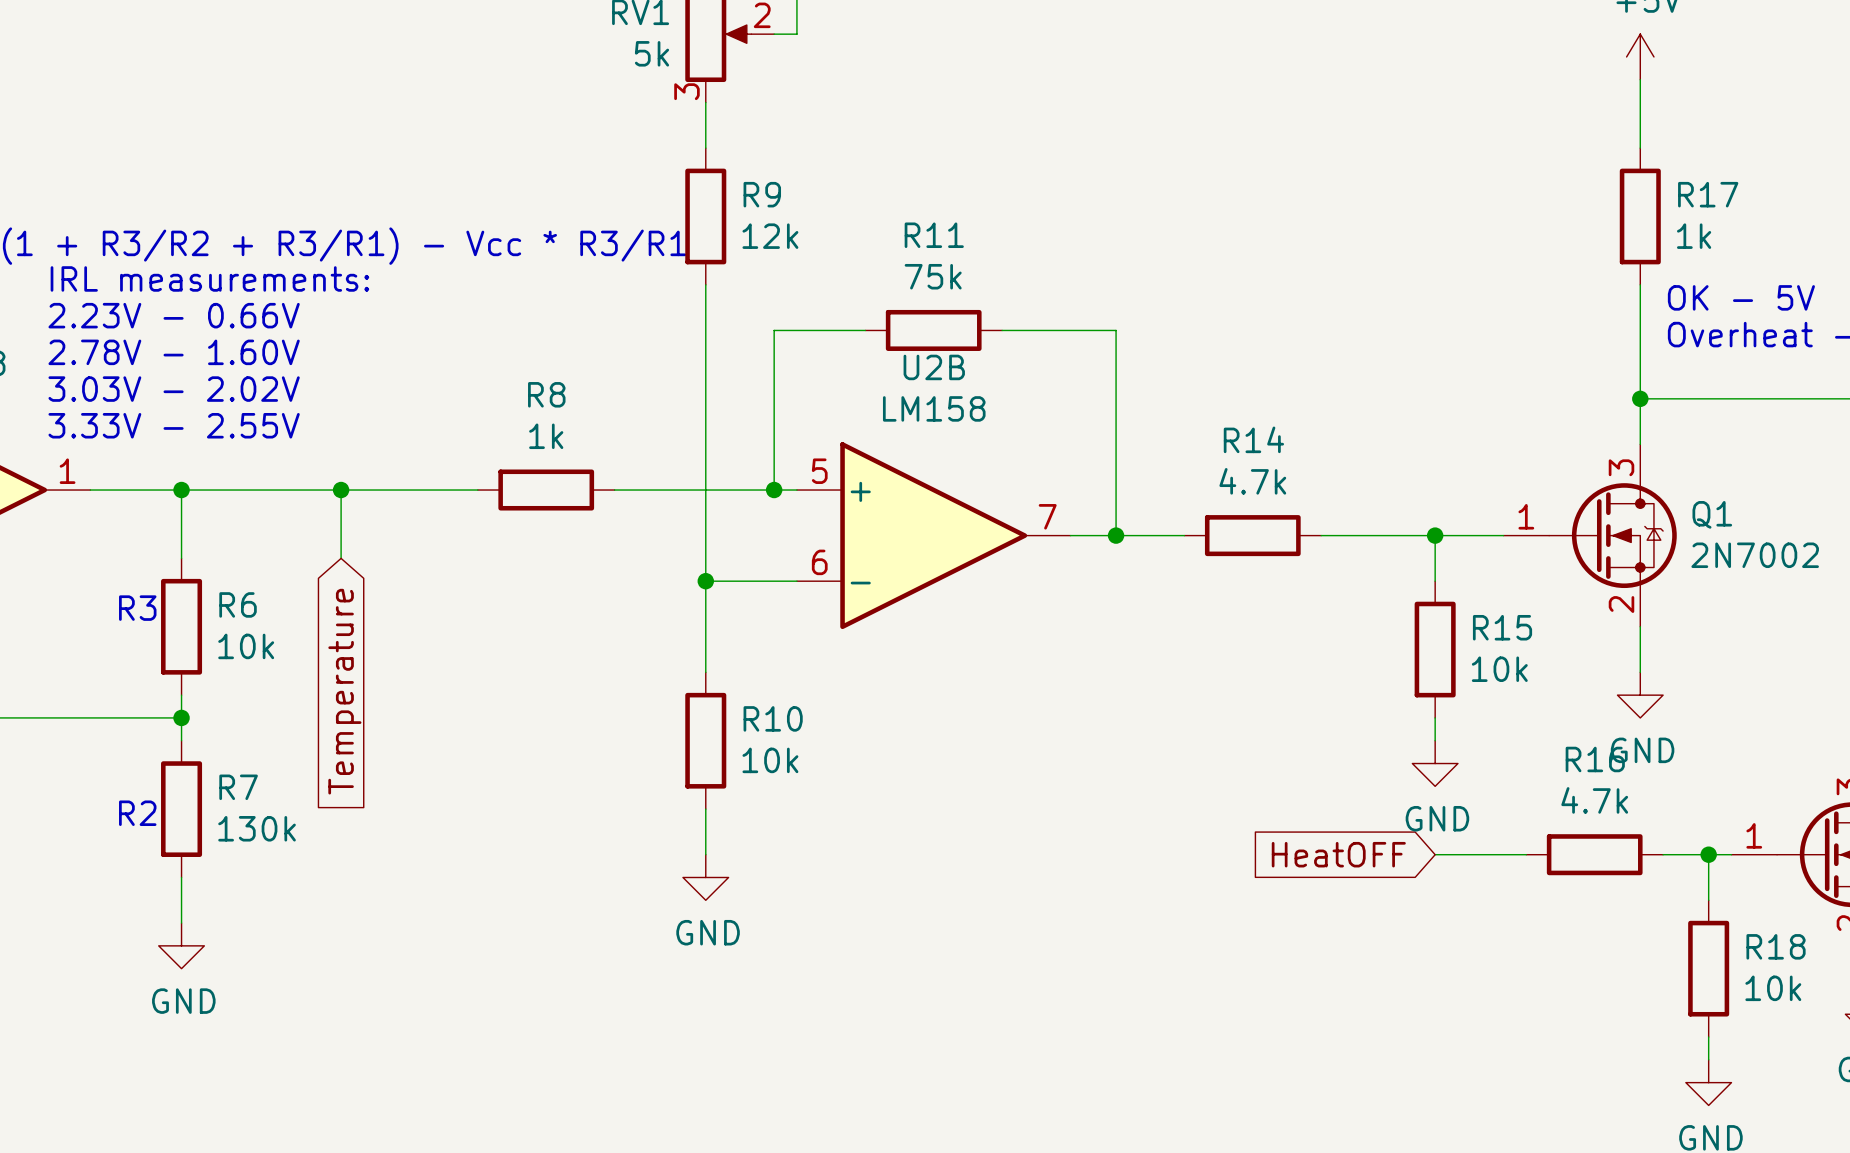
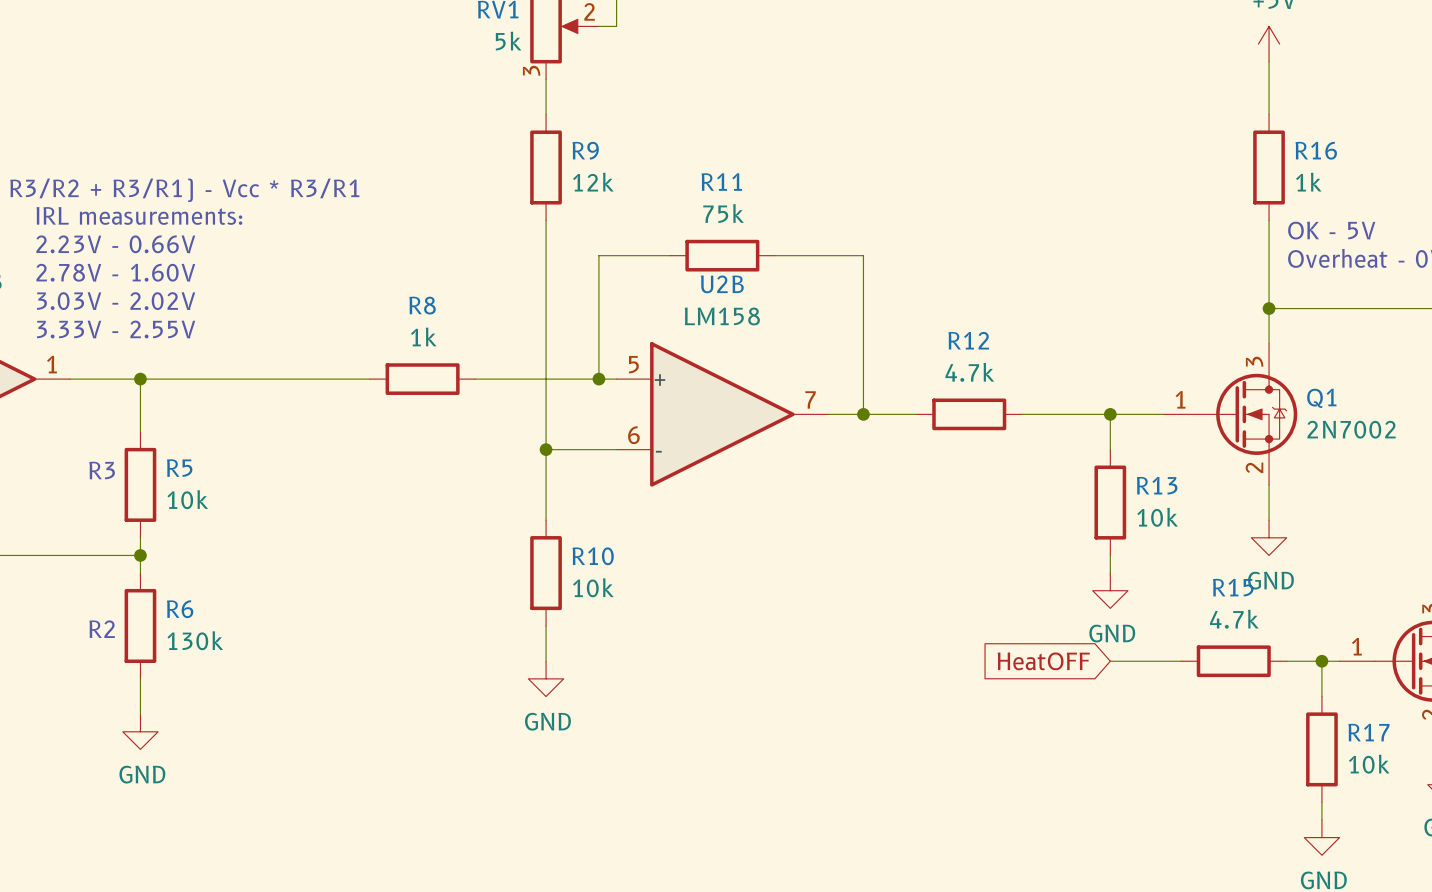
R17 name: R17 (1708, 194) -> R16 (1316, 150)
R14 name: R14 (1253, 439) -> R12 (968, 340)
wire: (341, 490) (341, 558) -> none
junction: (341, 490) -> none
R6 name: R6 (238, 604) -> R5 (179, 468)
R15 name: R15 (1502, 627) -> R13 (1157, 485)
global label: Temperature (344, 691) -> none
R16 name: R16 (1595, 759) -> R15 (1233, 587)
R7 name: R7 (238, 787) -> R6 (180, 609)
R18 name: R18 (1776, 946) -> R17 (1368, 732)

